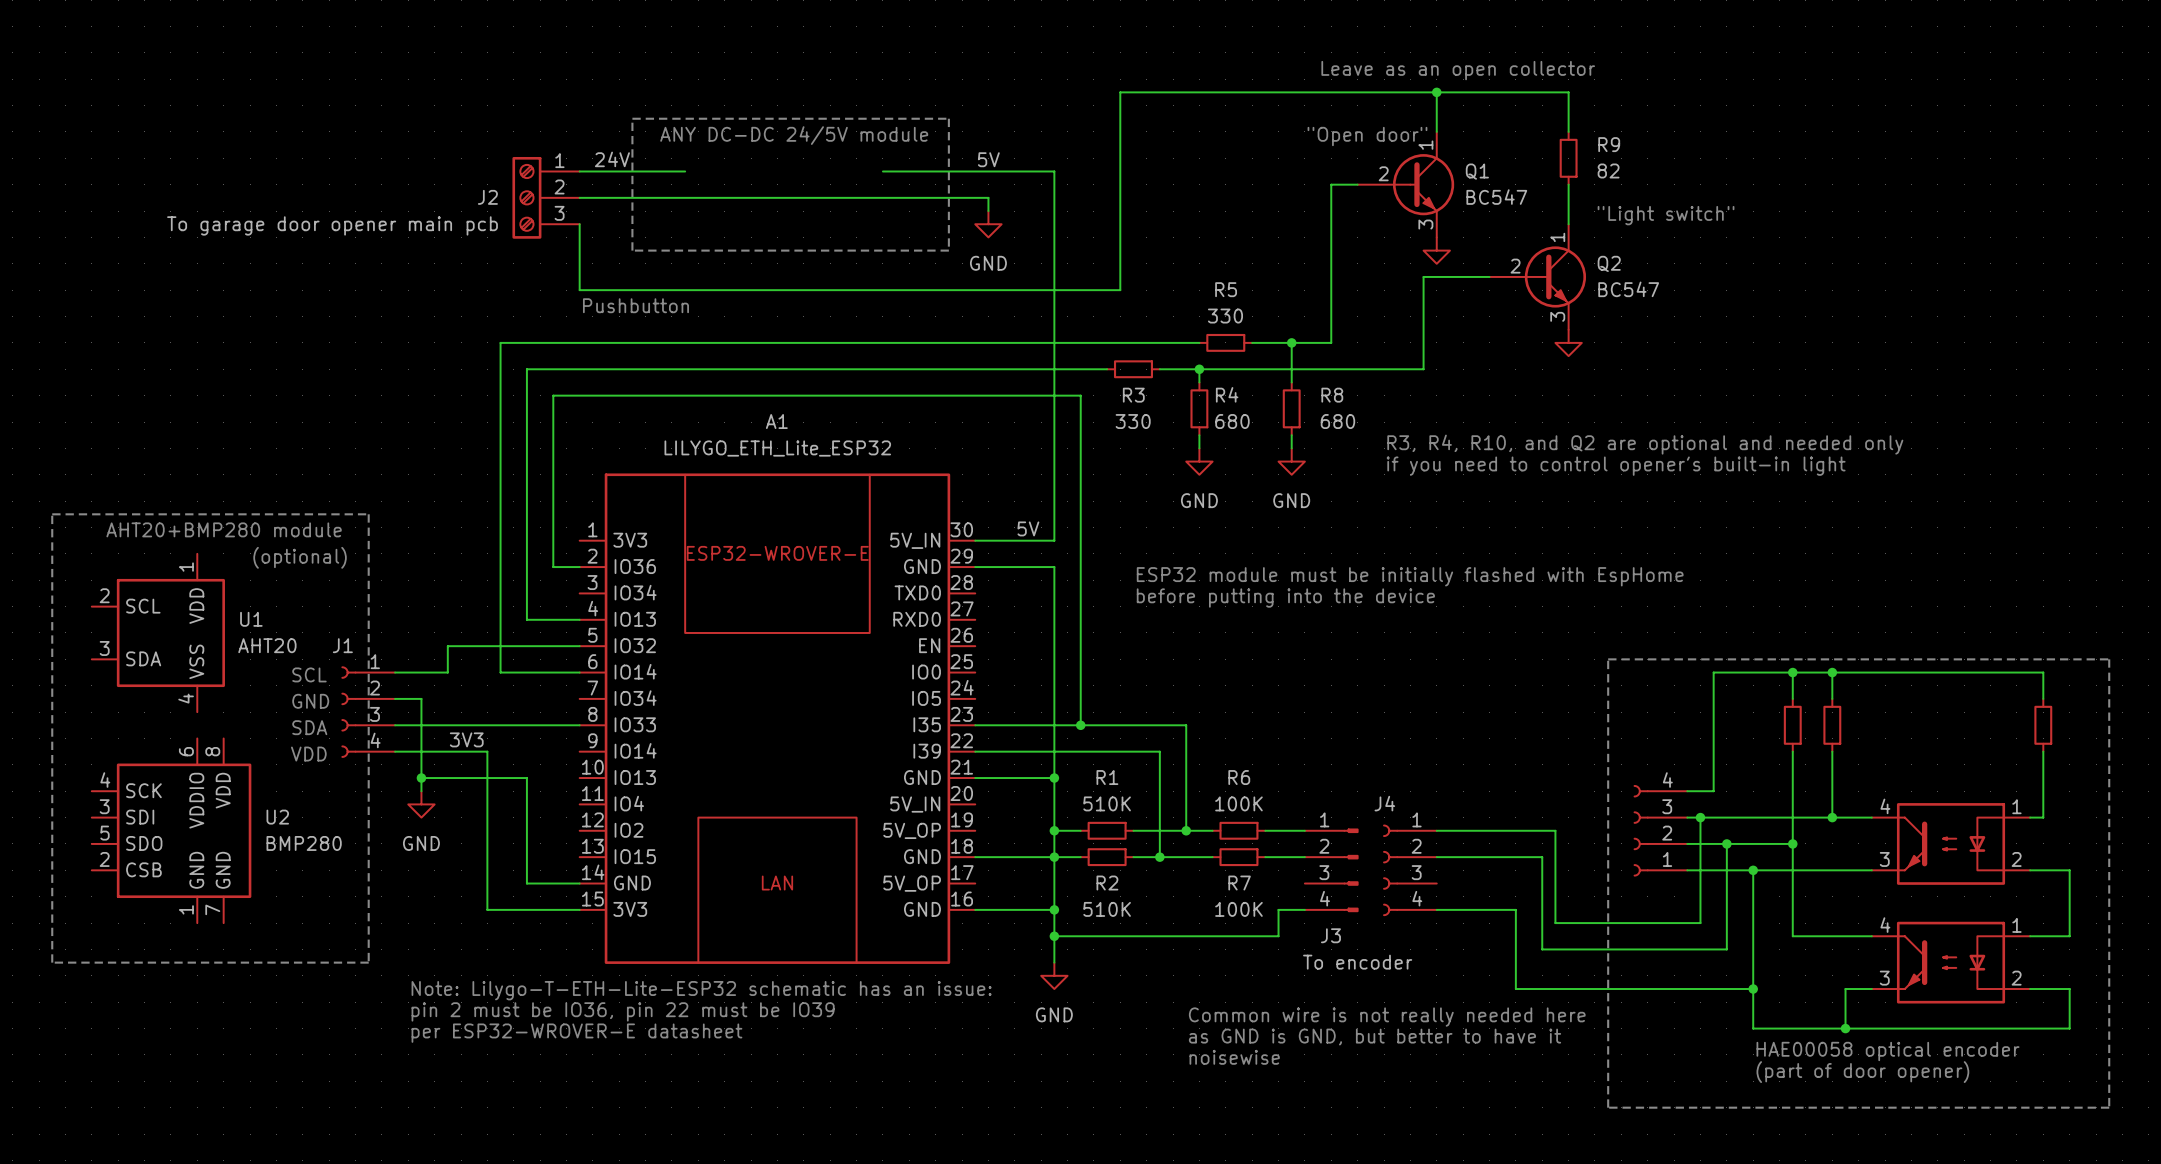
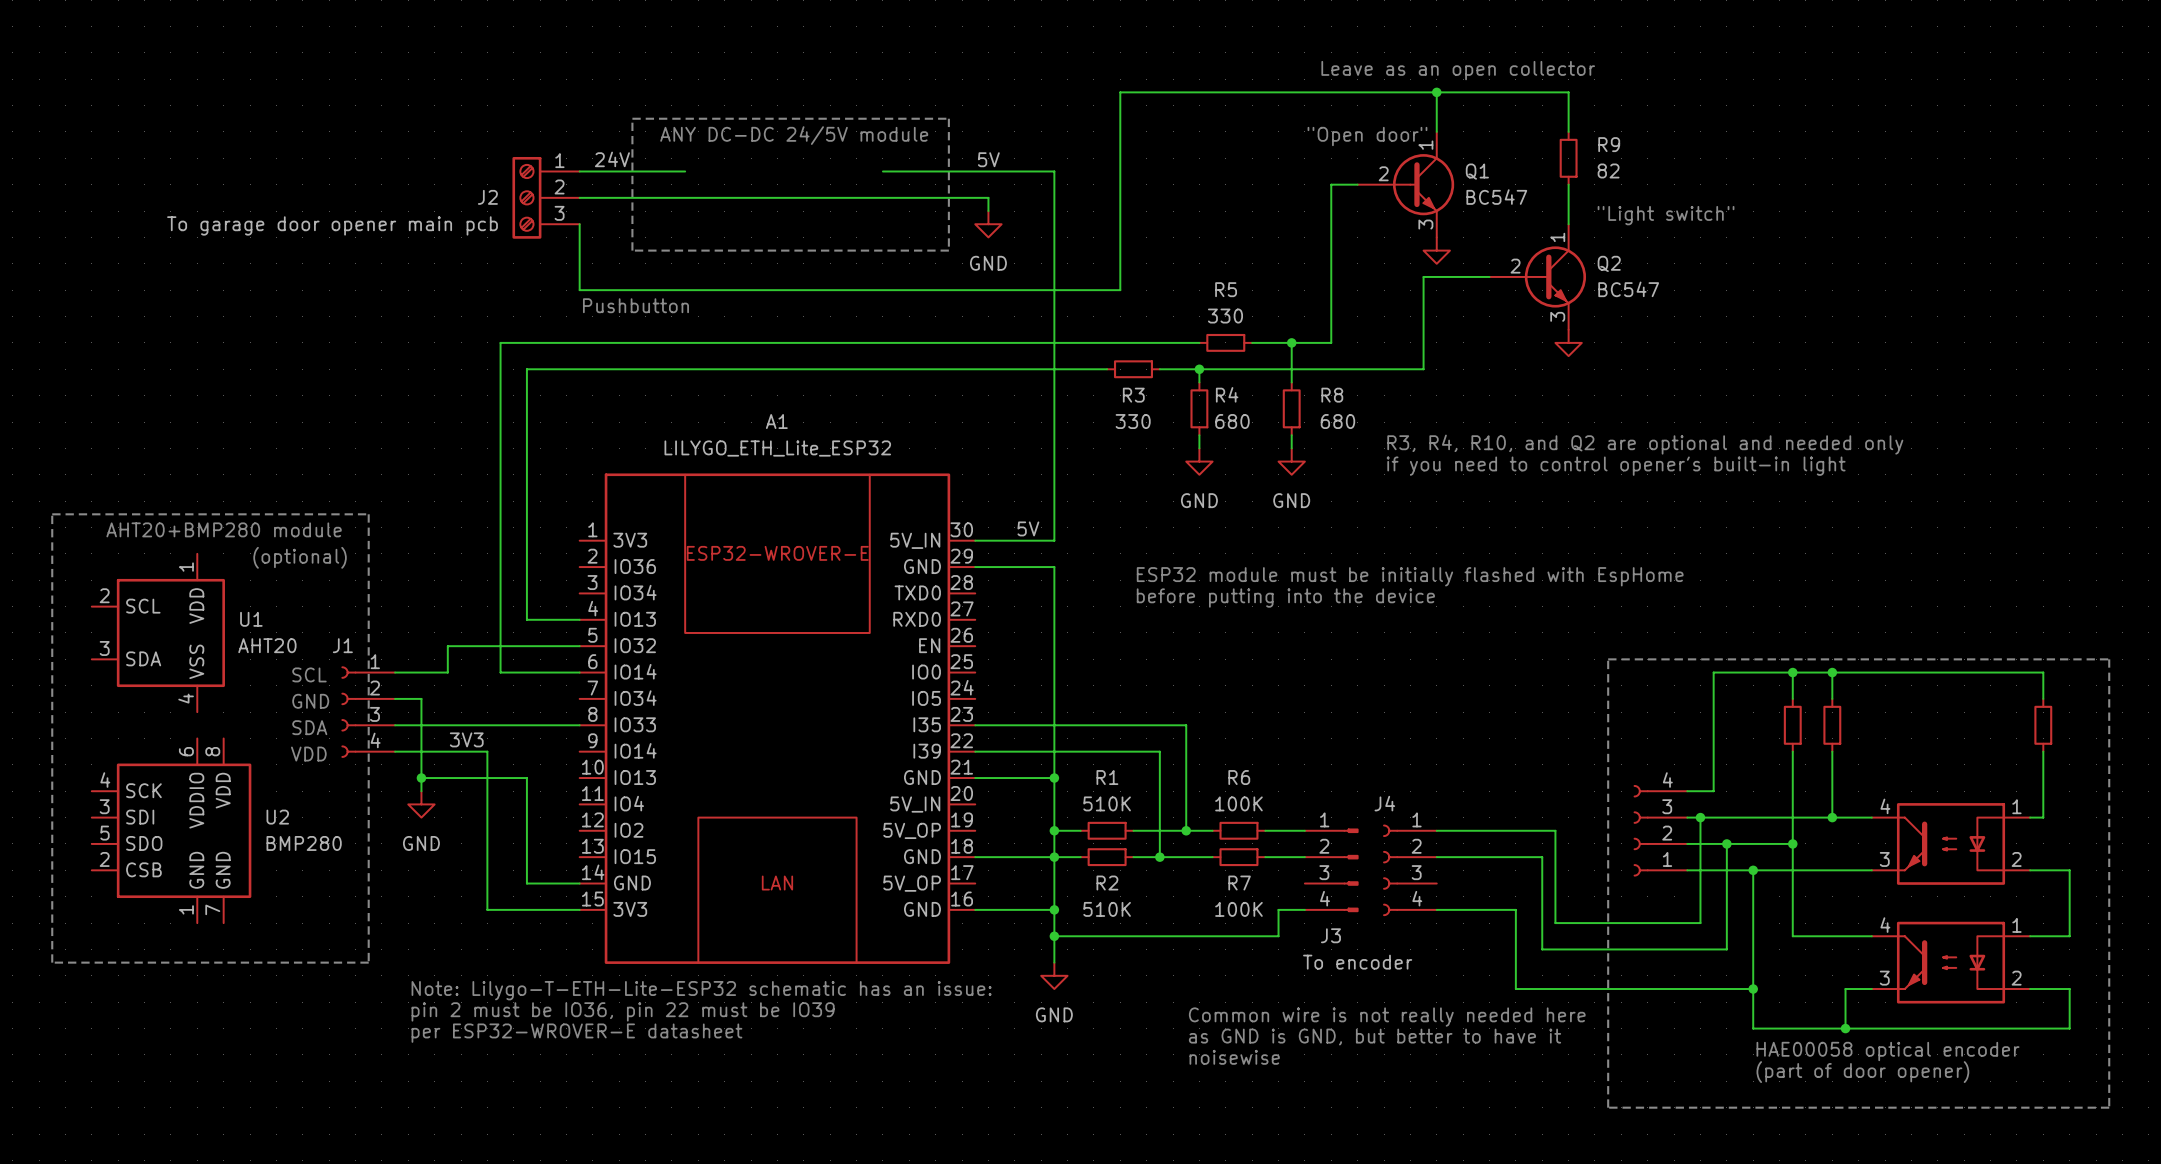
wire: (579, 567) (553, 567) (553, 395) (1080, 395) (1080, 725) -> none
junction: (1080, 725) -> none

